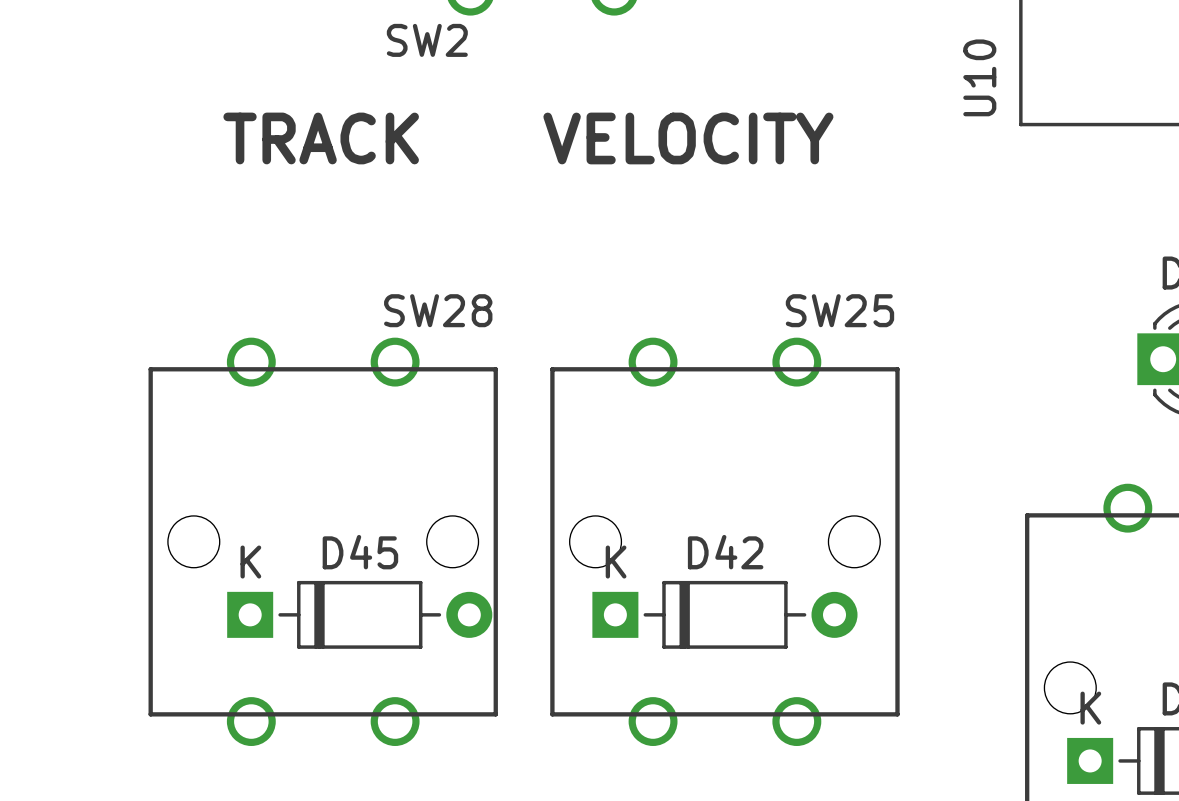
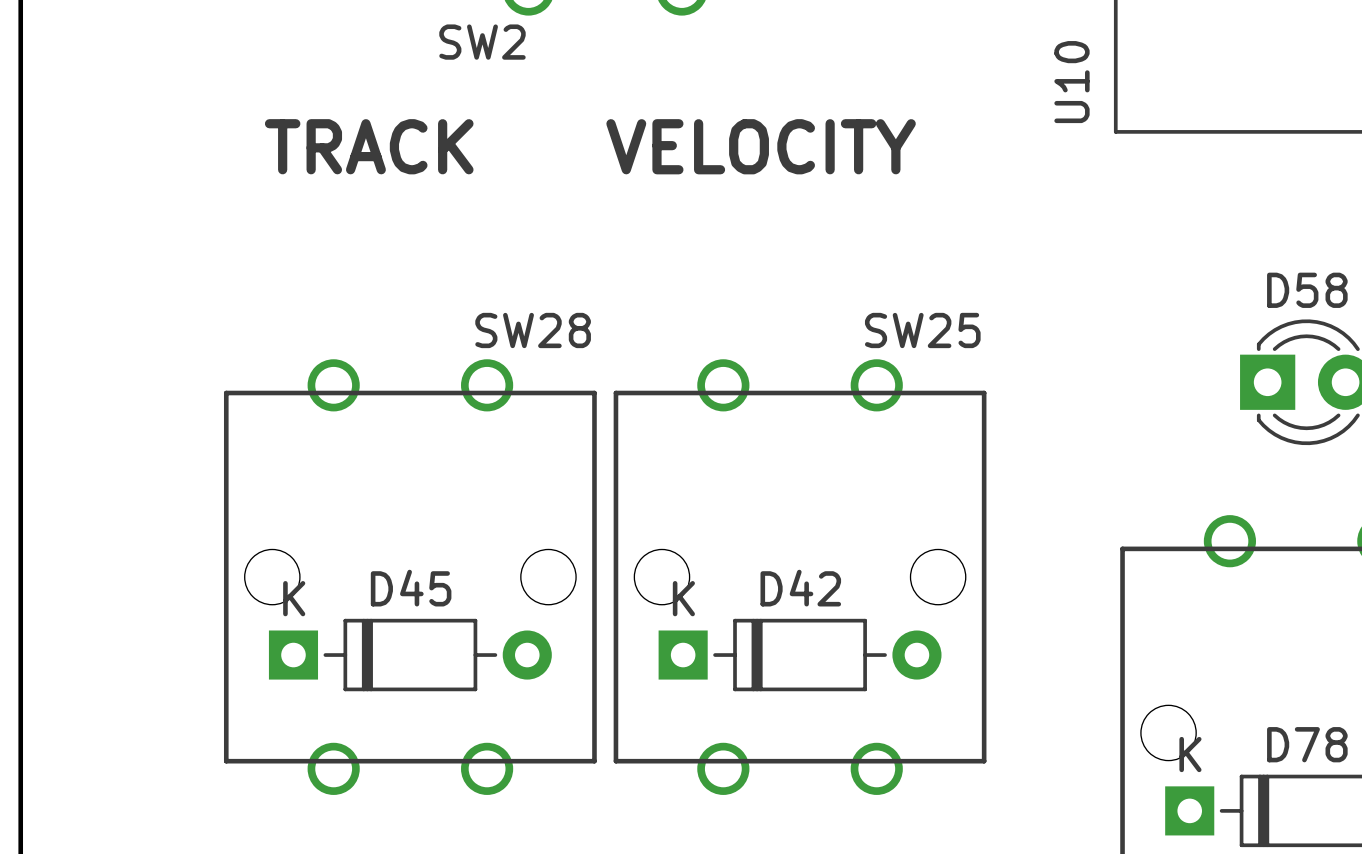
SW28 position: (323, 541) -> (410, 577)

